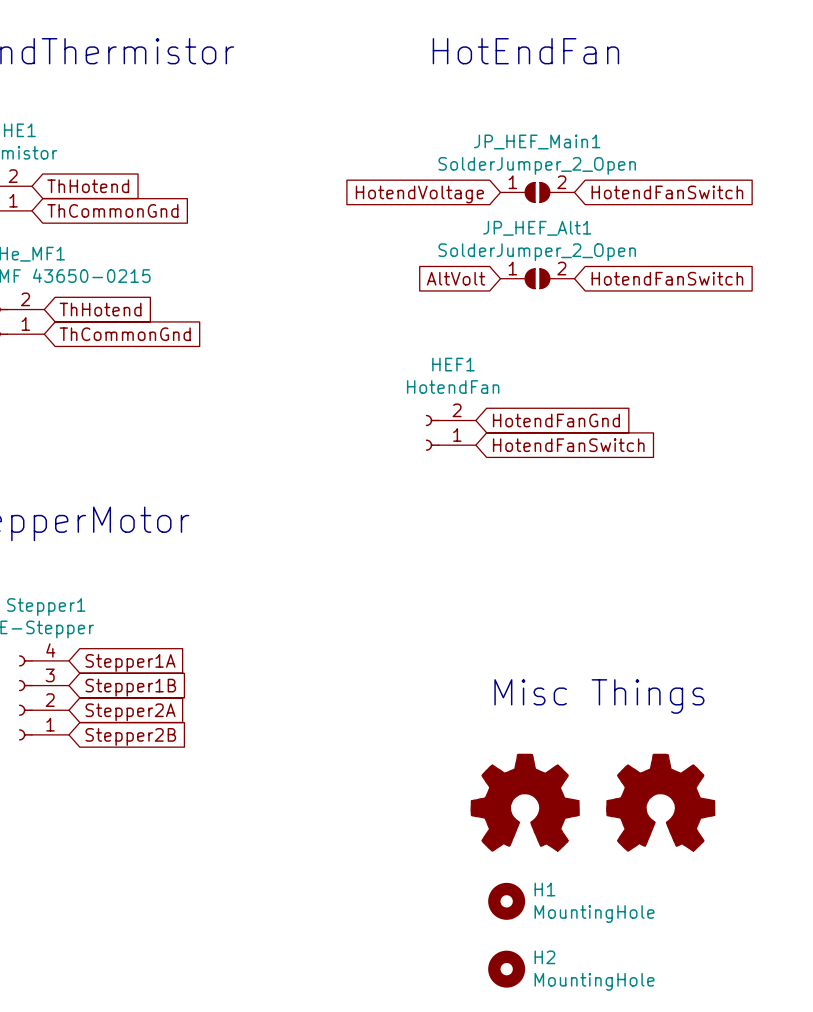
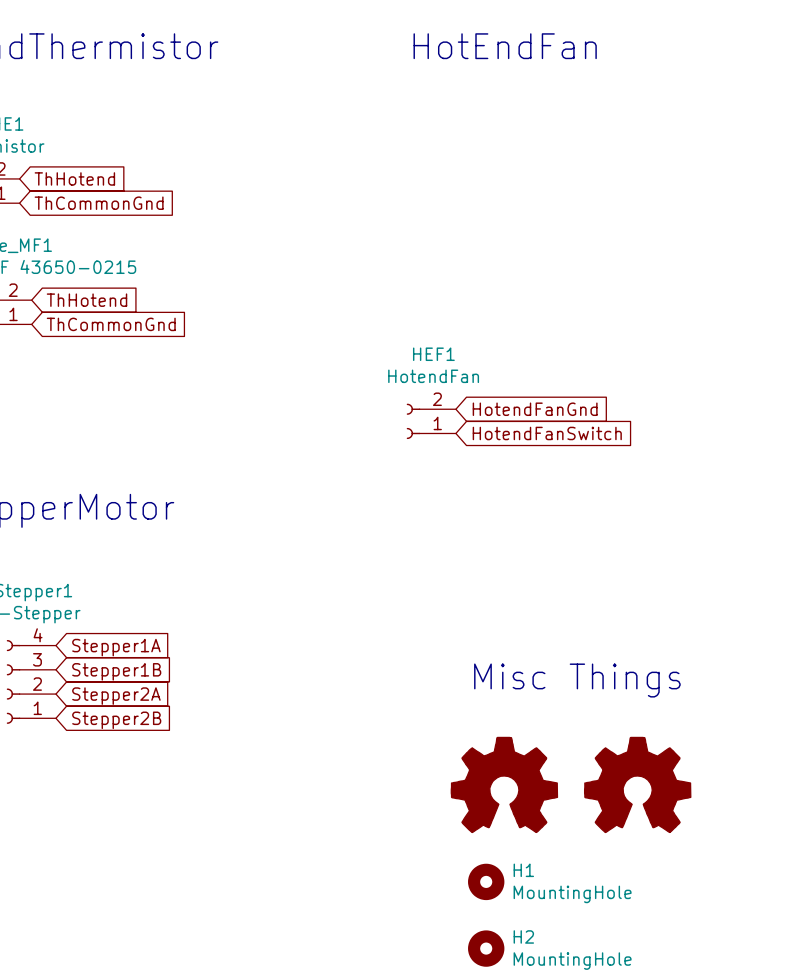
JP_HEF_Main1: SolderJumper_2_Open (537, 192) -> none
global label: HotendFanSwitch (667, 192) -> none
global label: HotendVoltage (419, 194) -> none
global label: AltVolt (456, 278) -> none
JP_HEF_Alt1: SolderJumper_2_Open (537, 278) -> none
global label: HotendFanSwitch (667, 278) -> none

